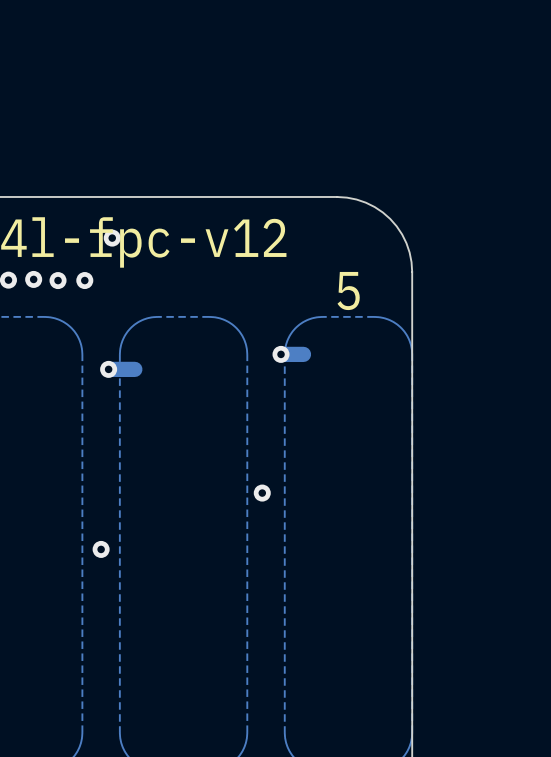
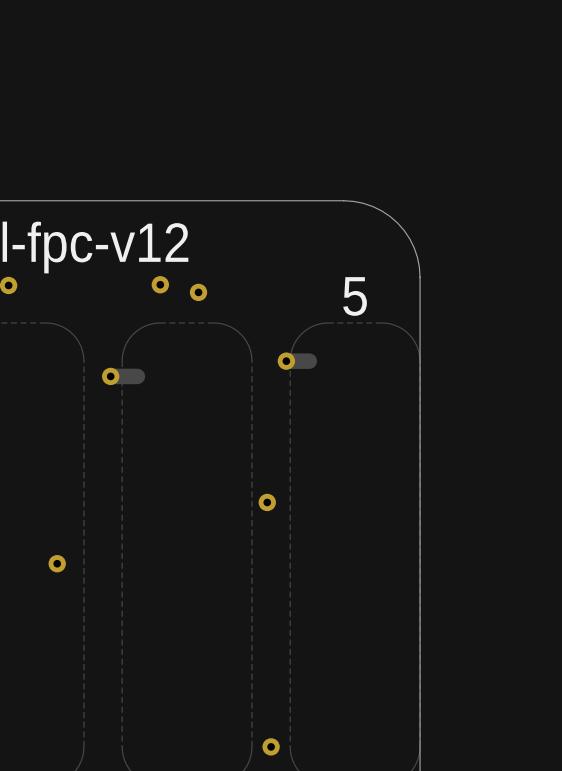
via: (112, 238) -> none
via: (33, 279) -> none
via: none -> (160, 284)
via: (58, 280) -> none
via: (84, 280) -> none
via: none -> (198, 292)
via position: (101, 549) -> (57, 563)
via: none -> (271, 746)

